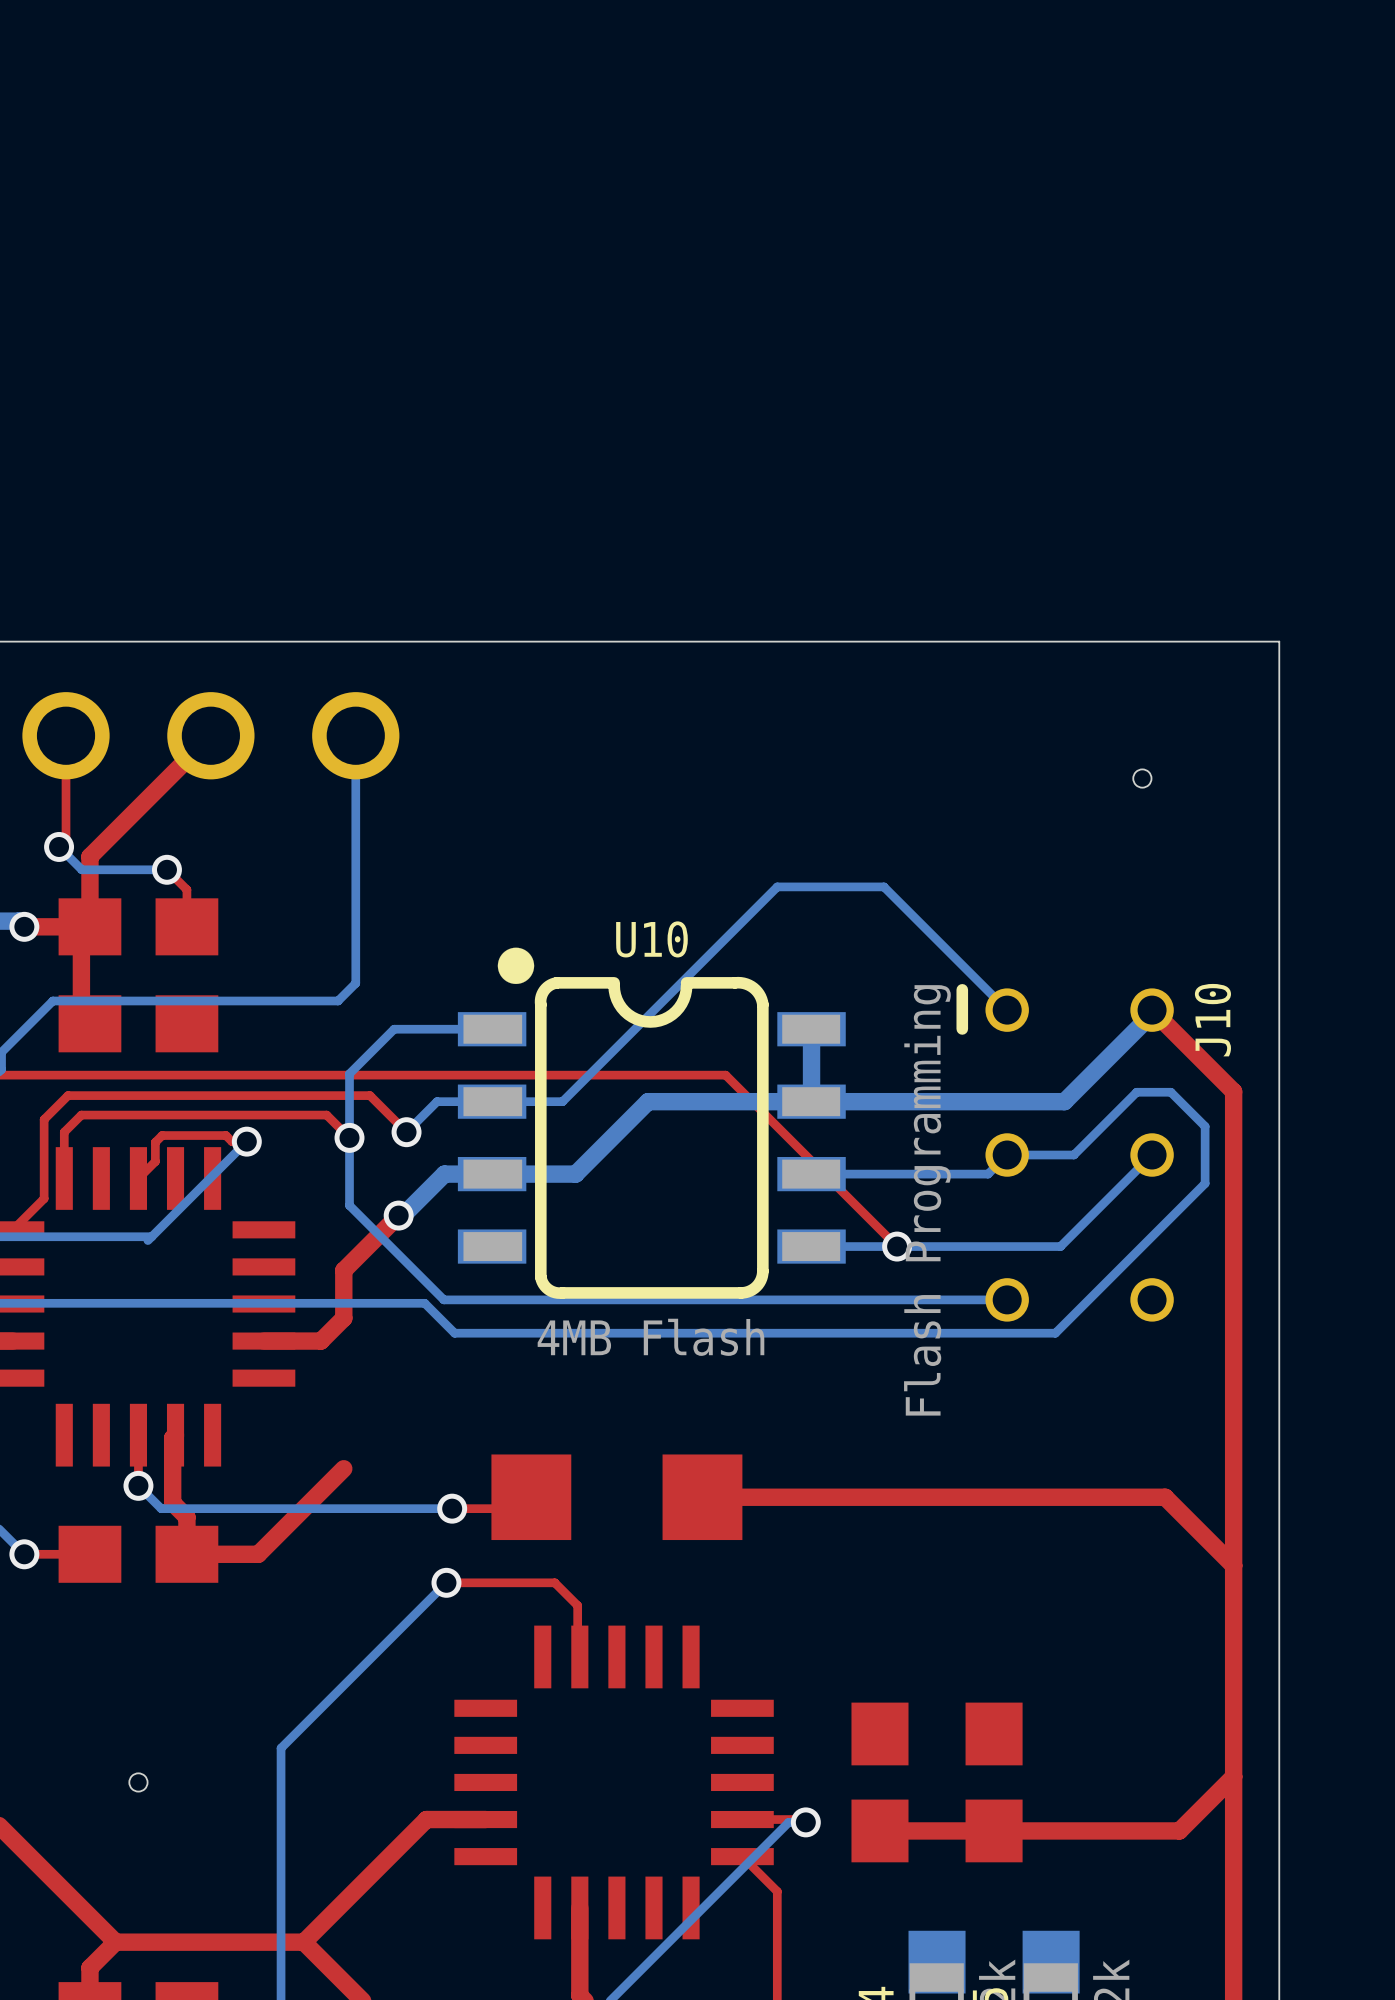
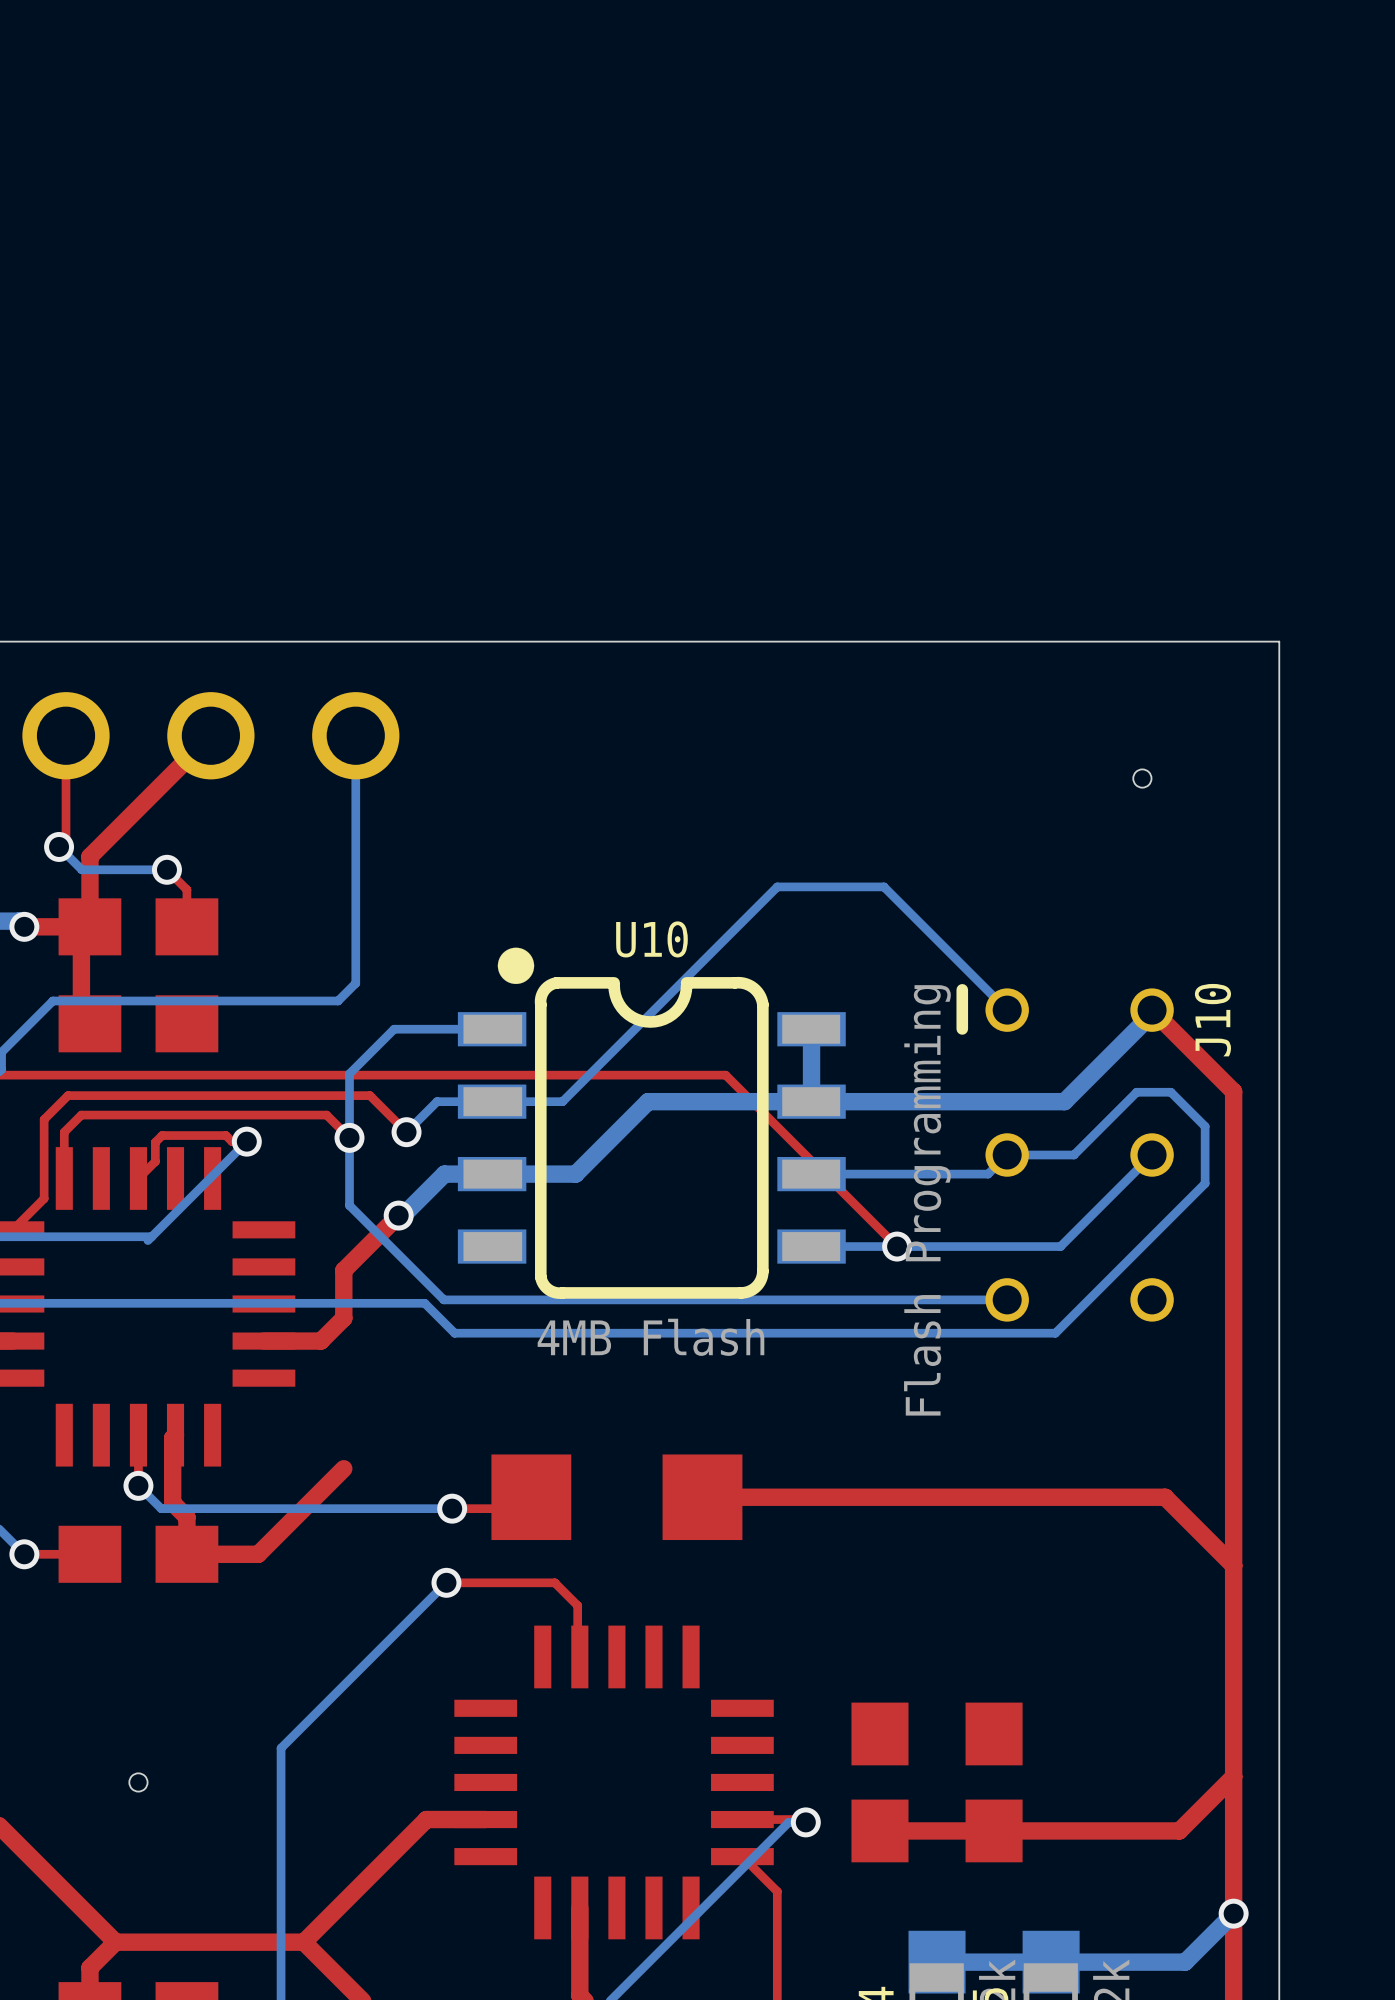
bottom track: none -> (1233, 1913) (1185, 1962) (937, 1962)
via: none -> (1233, 1913)

